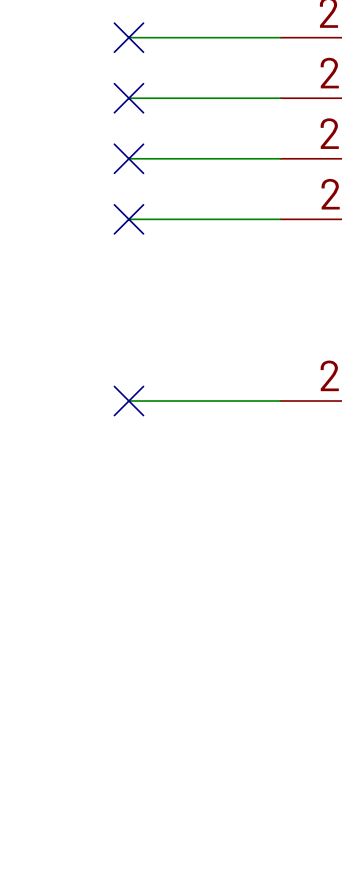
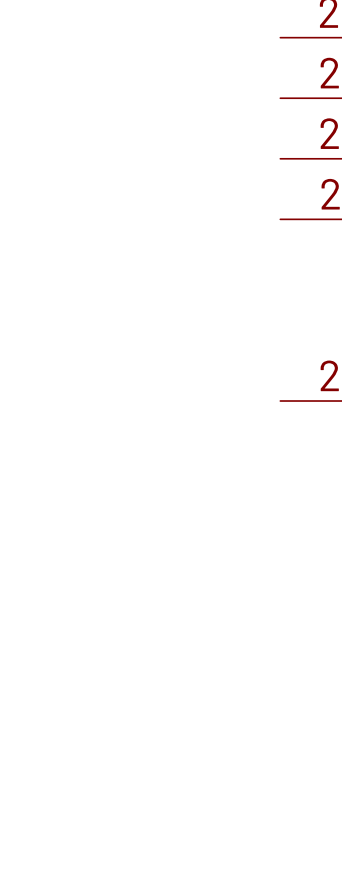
wire: (128, 37) (280, 37) -> none
no-connect mark: (128, 37) -> none
wire: (128, 98) (280, 98) -> none
no-connect mark: (128, 98) -> none
wire: (128, 158) (280, 158) -> none
no-connect mark: (128, 158) -> none
wire: (128, 219) (280, 219) -> none
no-connect mark: (128, 219) -> none
wire: (128, 401) (280, 401) -> none
no-connect mark: (128, 401) -> none

